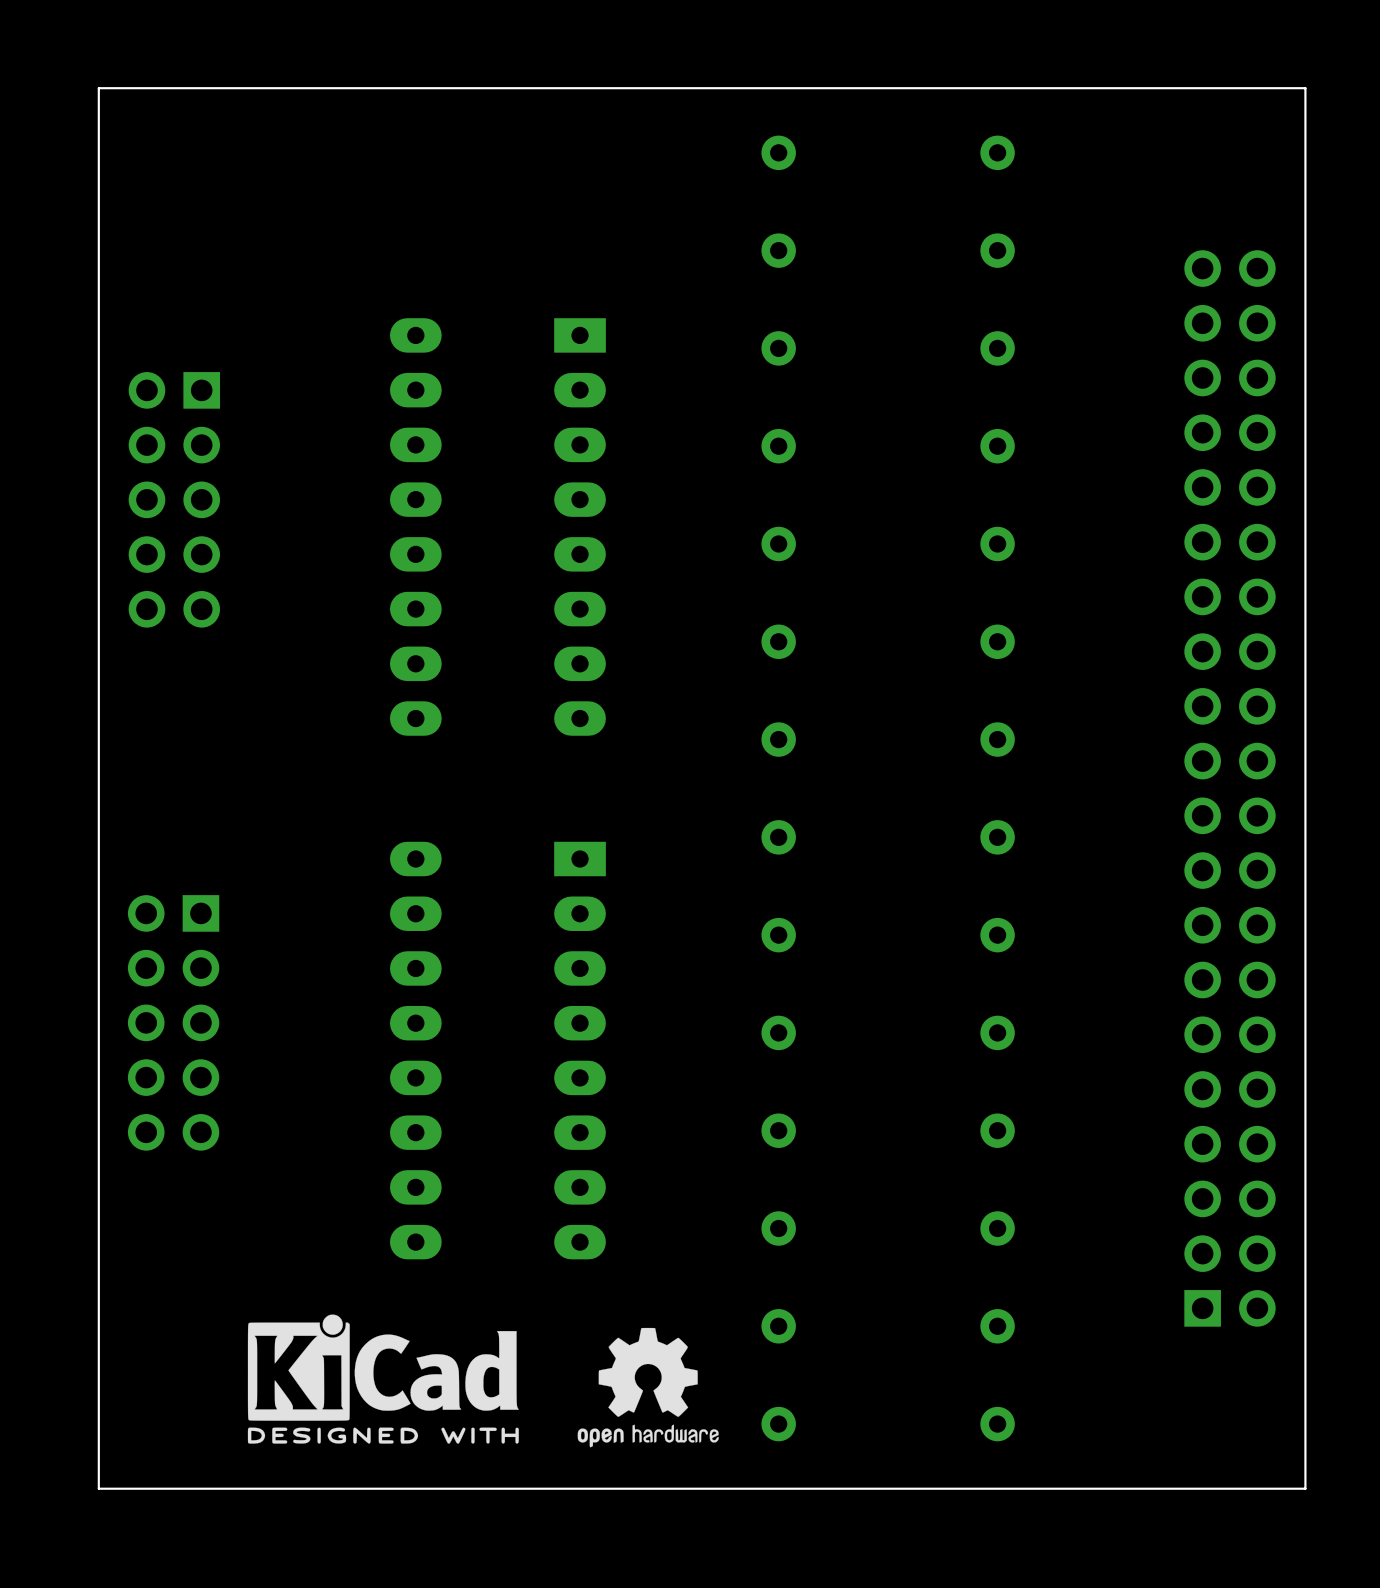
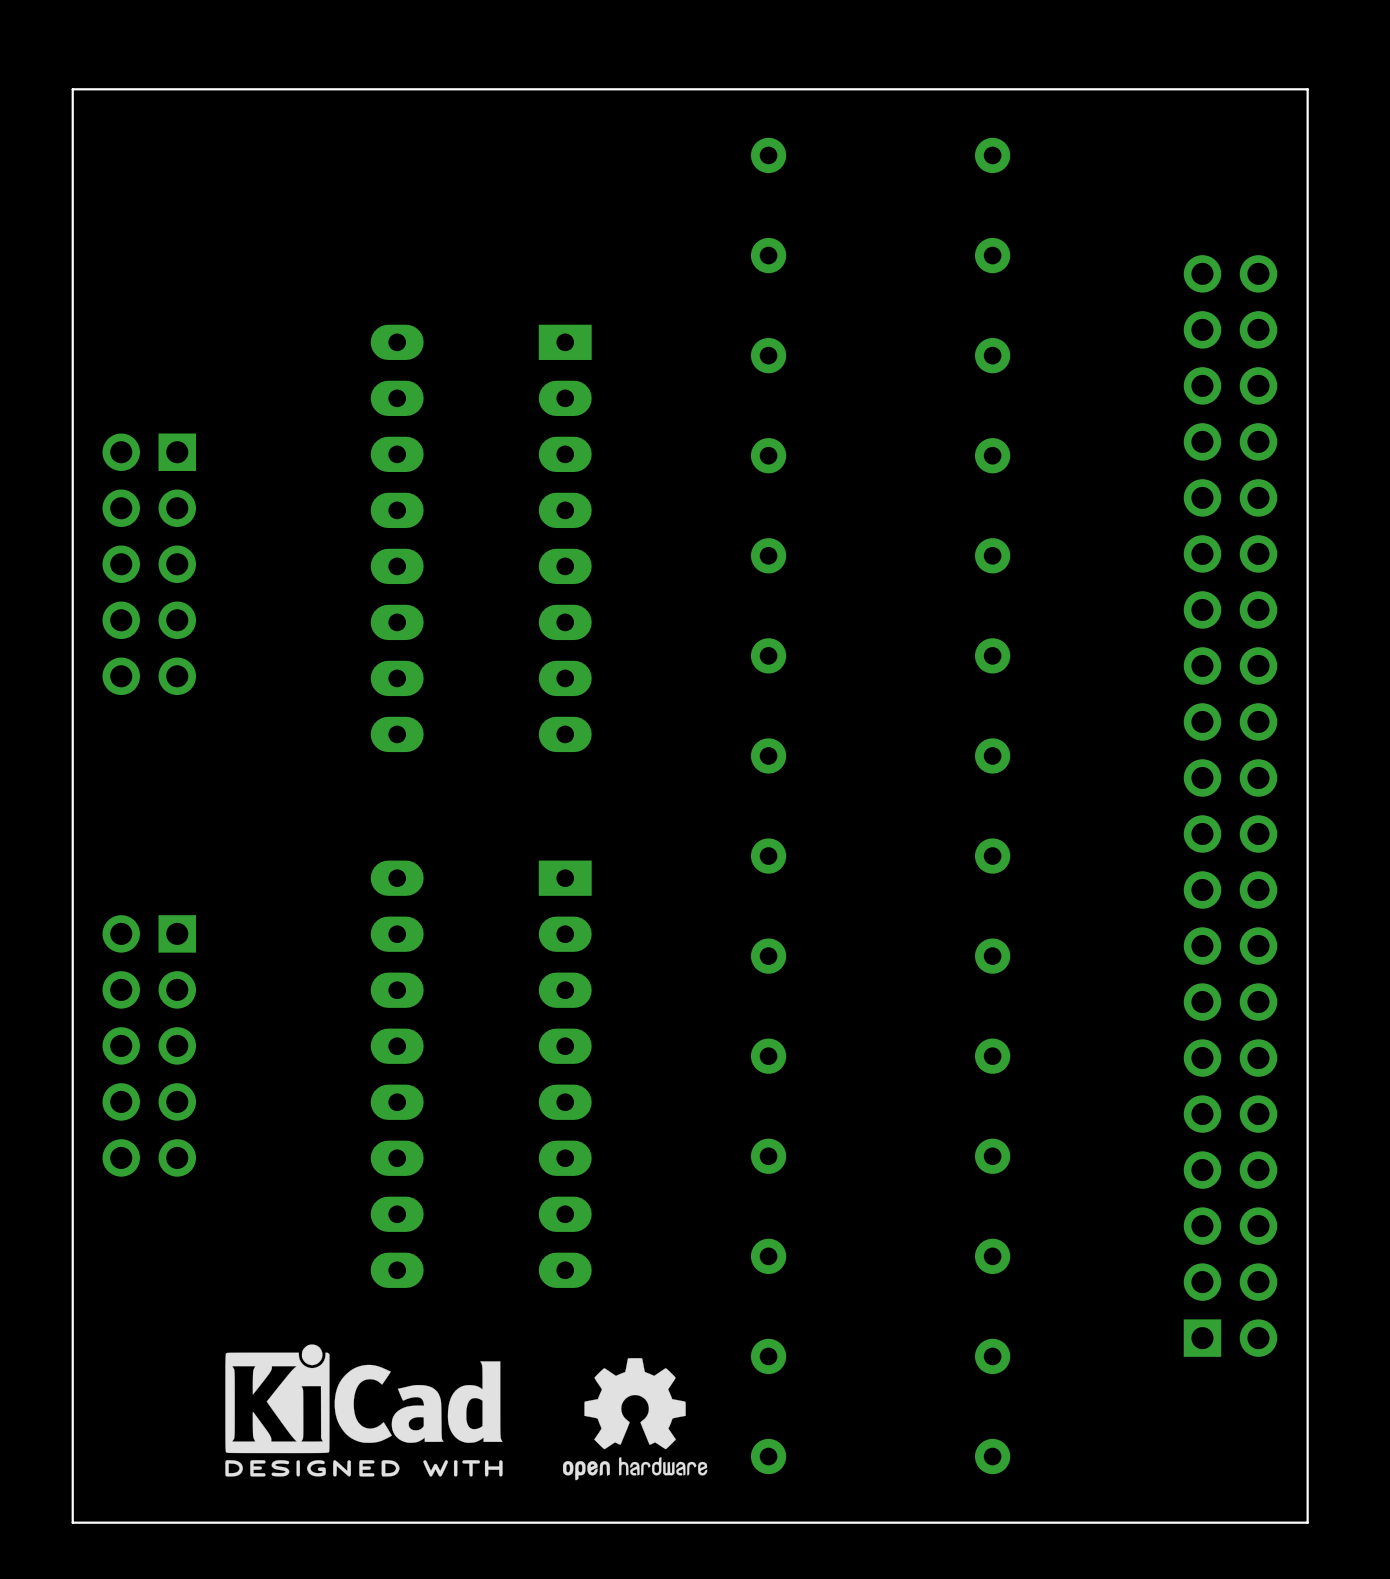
part position: (174, 499) -> (149, 564)

